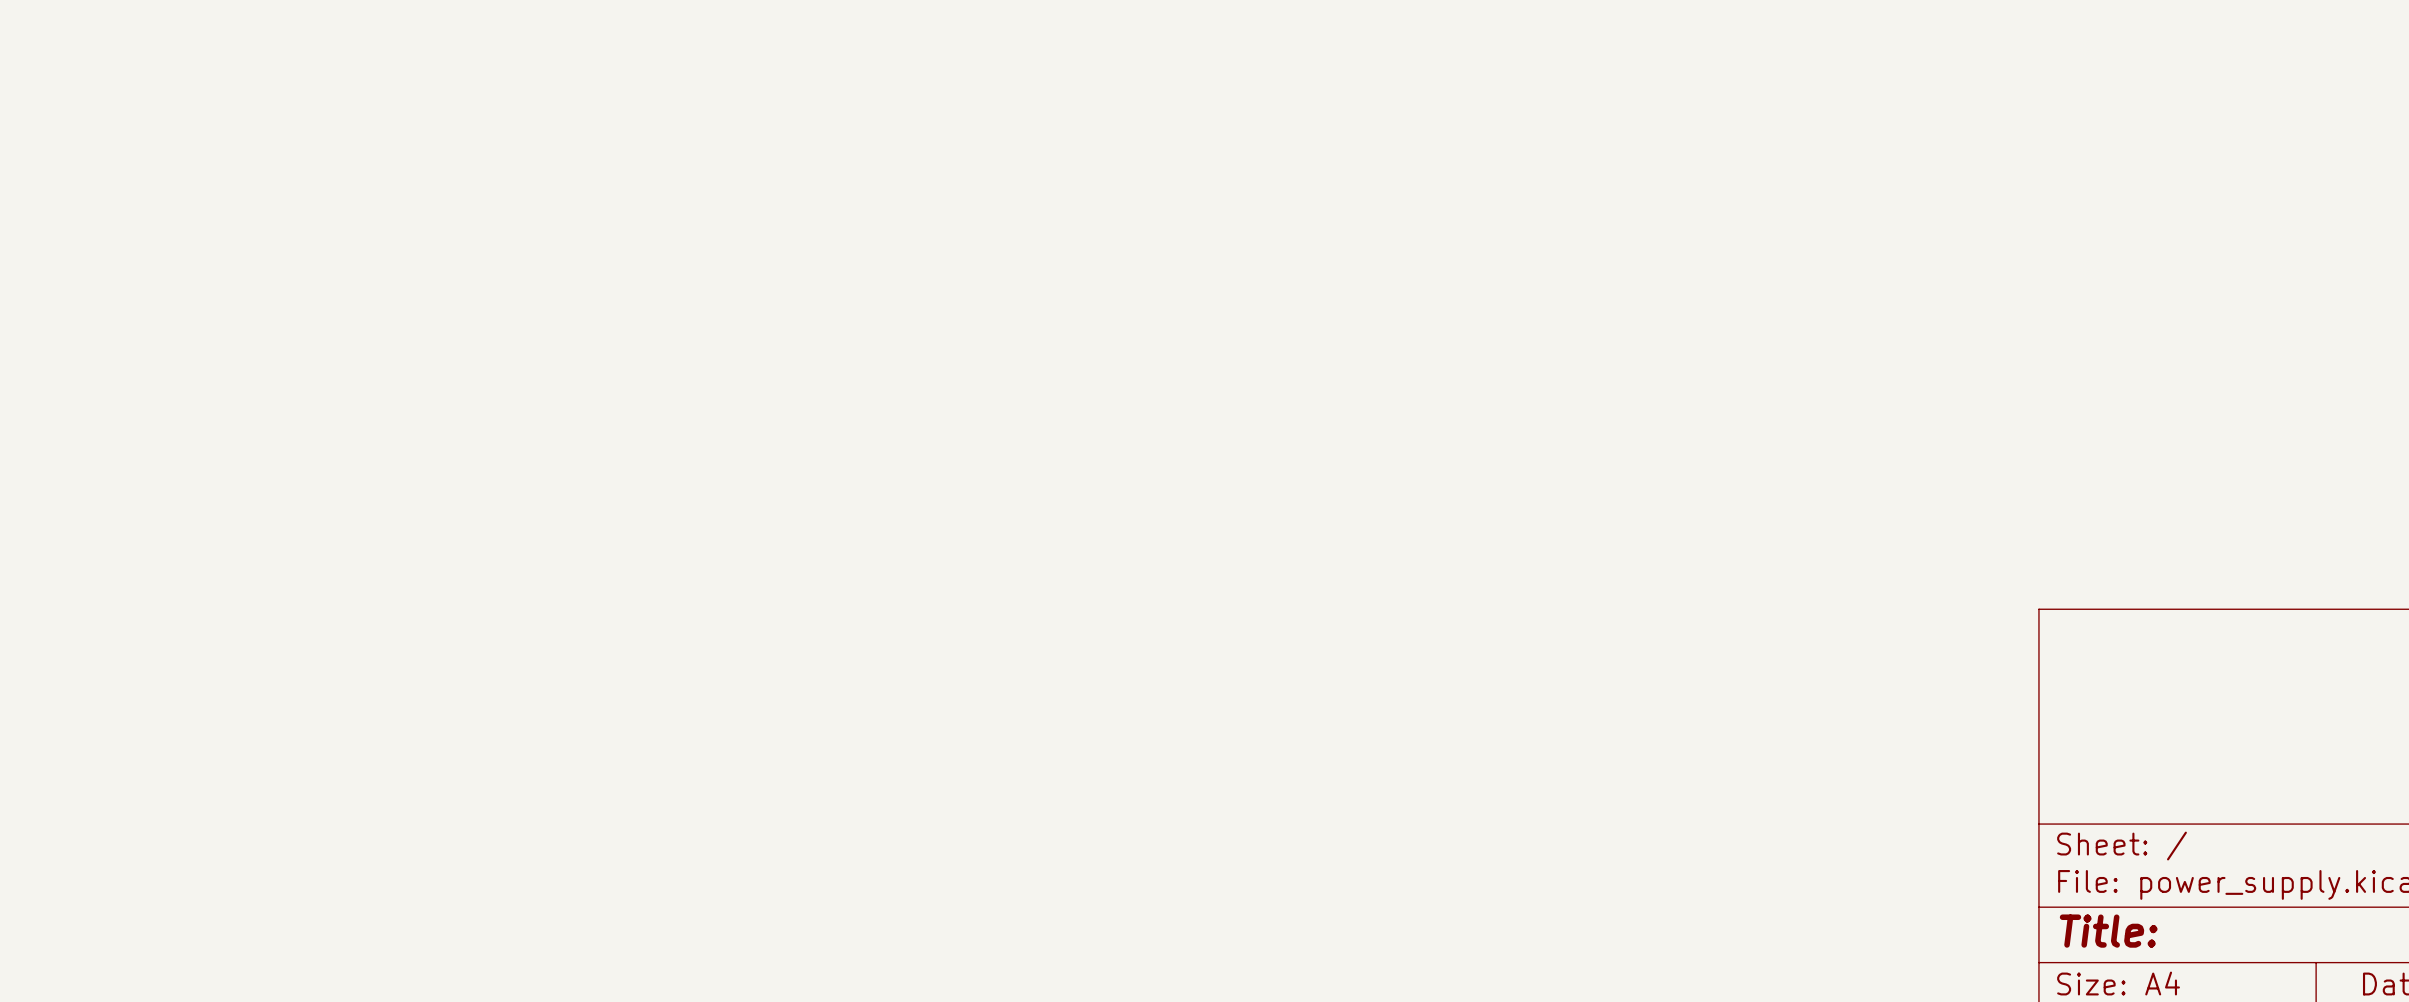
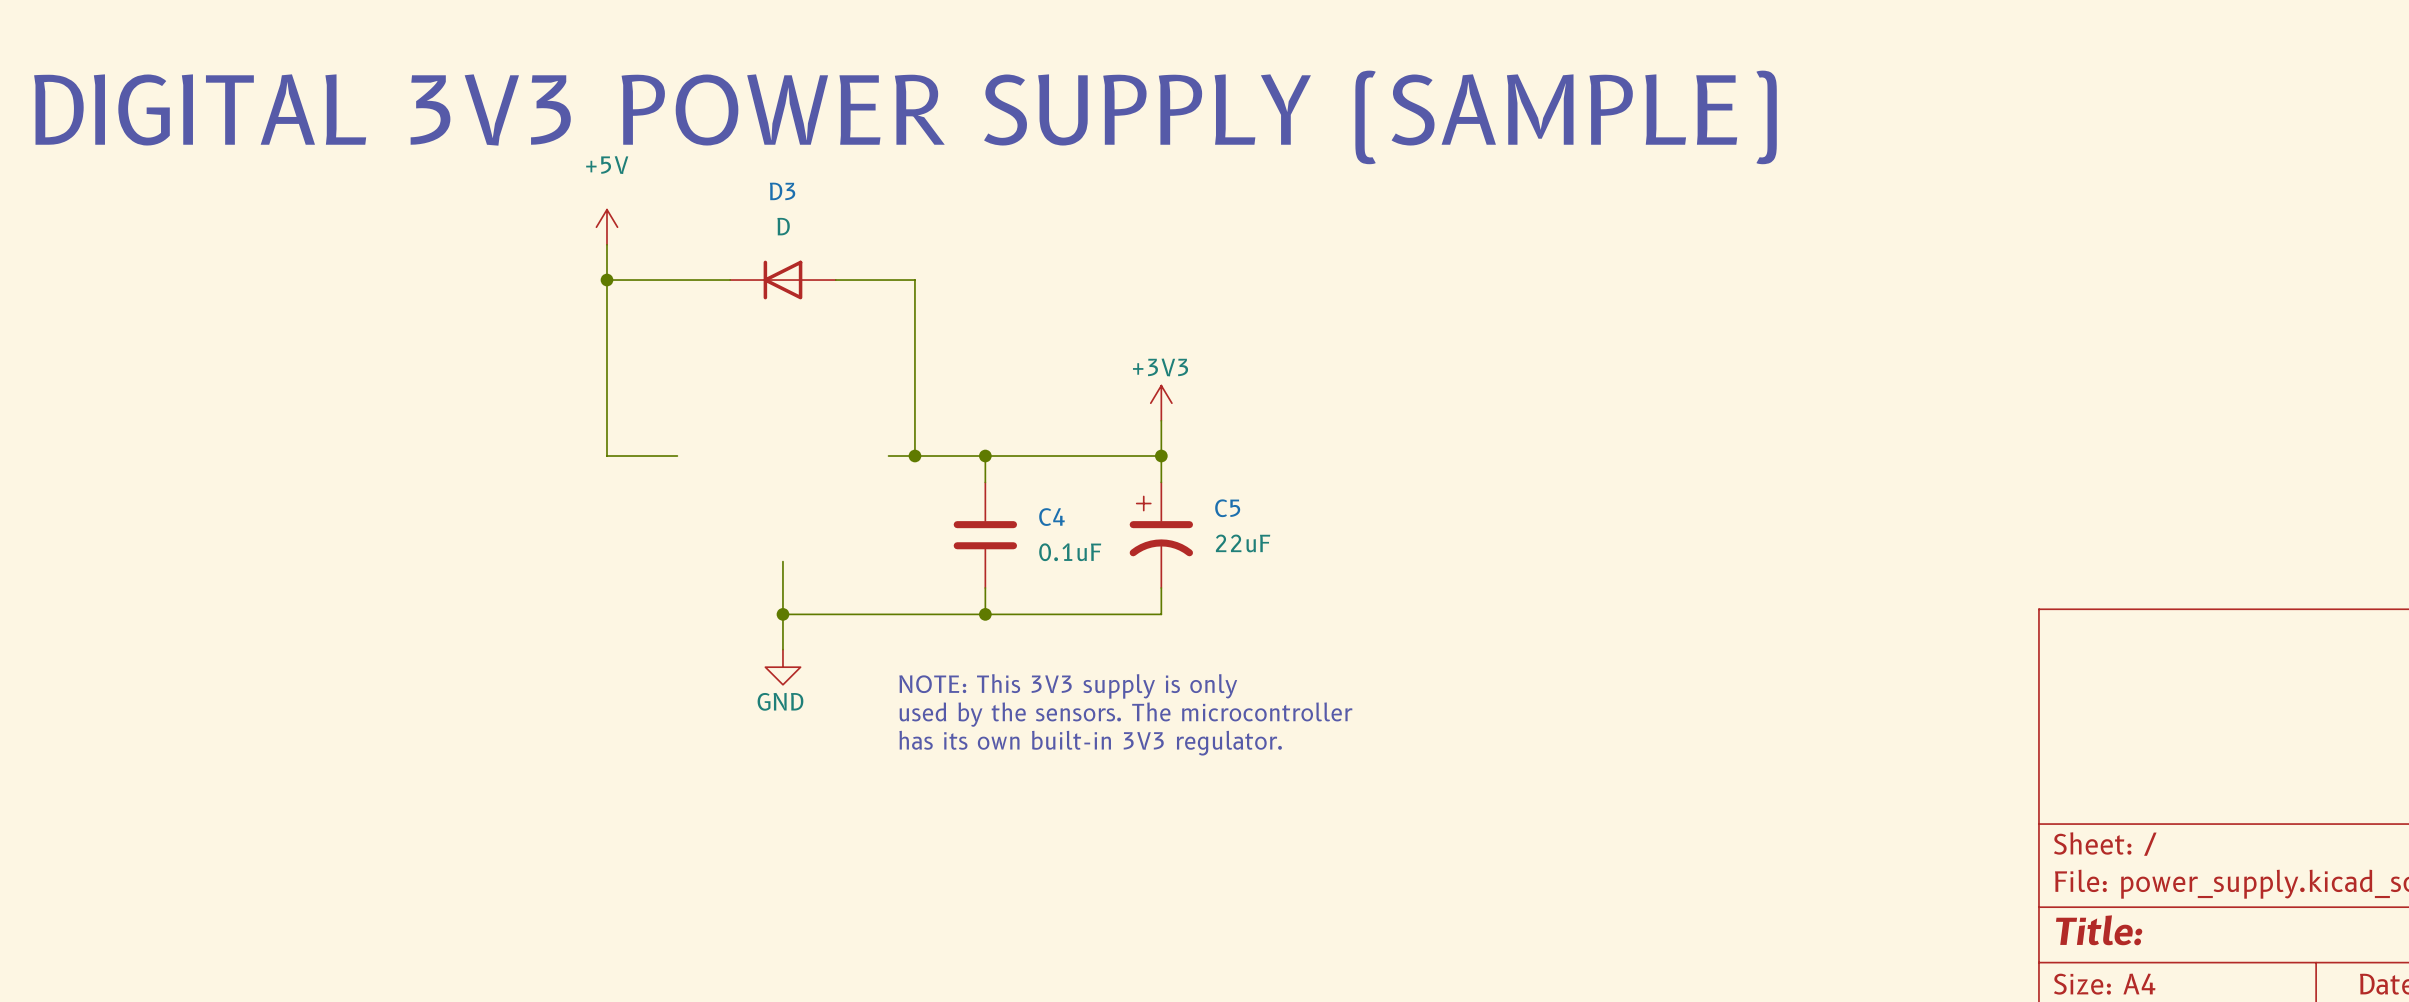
text: none -> DIGITAL 3V3 POWER SUPPLY (SAMPLE) (905, 117)
power symbol: none -> +5V (606, 227)
wire: none -> (606, 244) (606, 456) (677, 456)
wire: none -> (606, 280) (730, 280)
junction: none -> (606, 280)
D3: none -> D (782, 280)
wire: none -> (835, 280) (914, 280) (914, 456)
power symbol: none -> +3V3 (1161, 403)
wire: none -> (1161, 420) (1161, 482)
wire: none -> (888, 456) (1161, 456)
junction: none -> (914, 456)
wire: none -> (985, 456) (985, 482)
junction: none -> (985, 456)
junction: none -> (1161, 456)
C4: none -> 0.1uF (985, 535)
C5: none -> 22uF (1161, 535)
wire: none -> (782, 561) (782, 649)
wire: none -> (985, 587) (985, 614)
wire: none -> (1161, 587) (1161, 614) (782, 614)
junction: none -> (782, 614)
junction: none -> (985, 614)
power symbol: none -> GND (782, 667)
text: none -> NOTE: This 3V3 supply is only (1068, 686)
text: none -> used by the sensors. The microcontroller (1126, 714)
text: none -> has its own built-in 3V3 regulator. (1090, 743)

